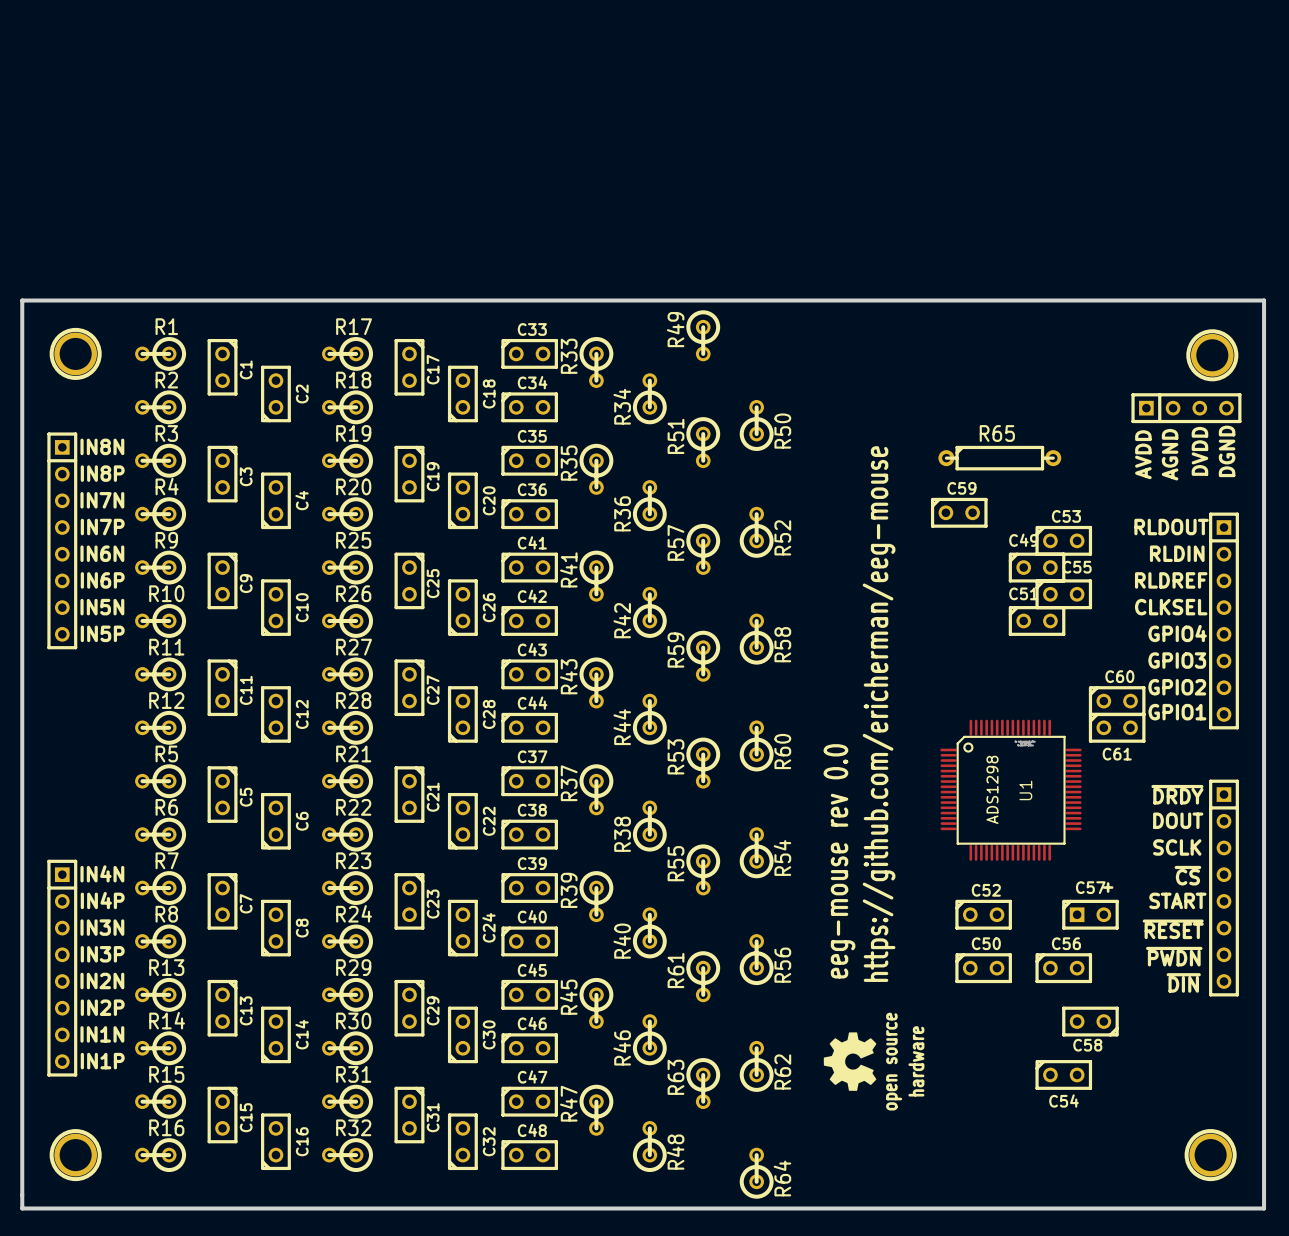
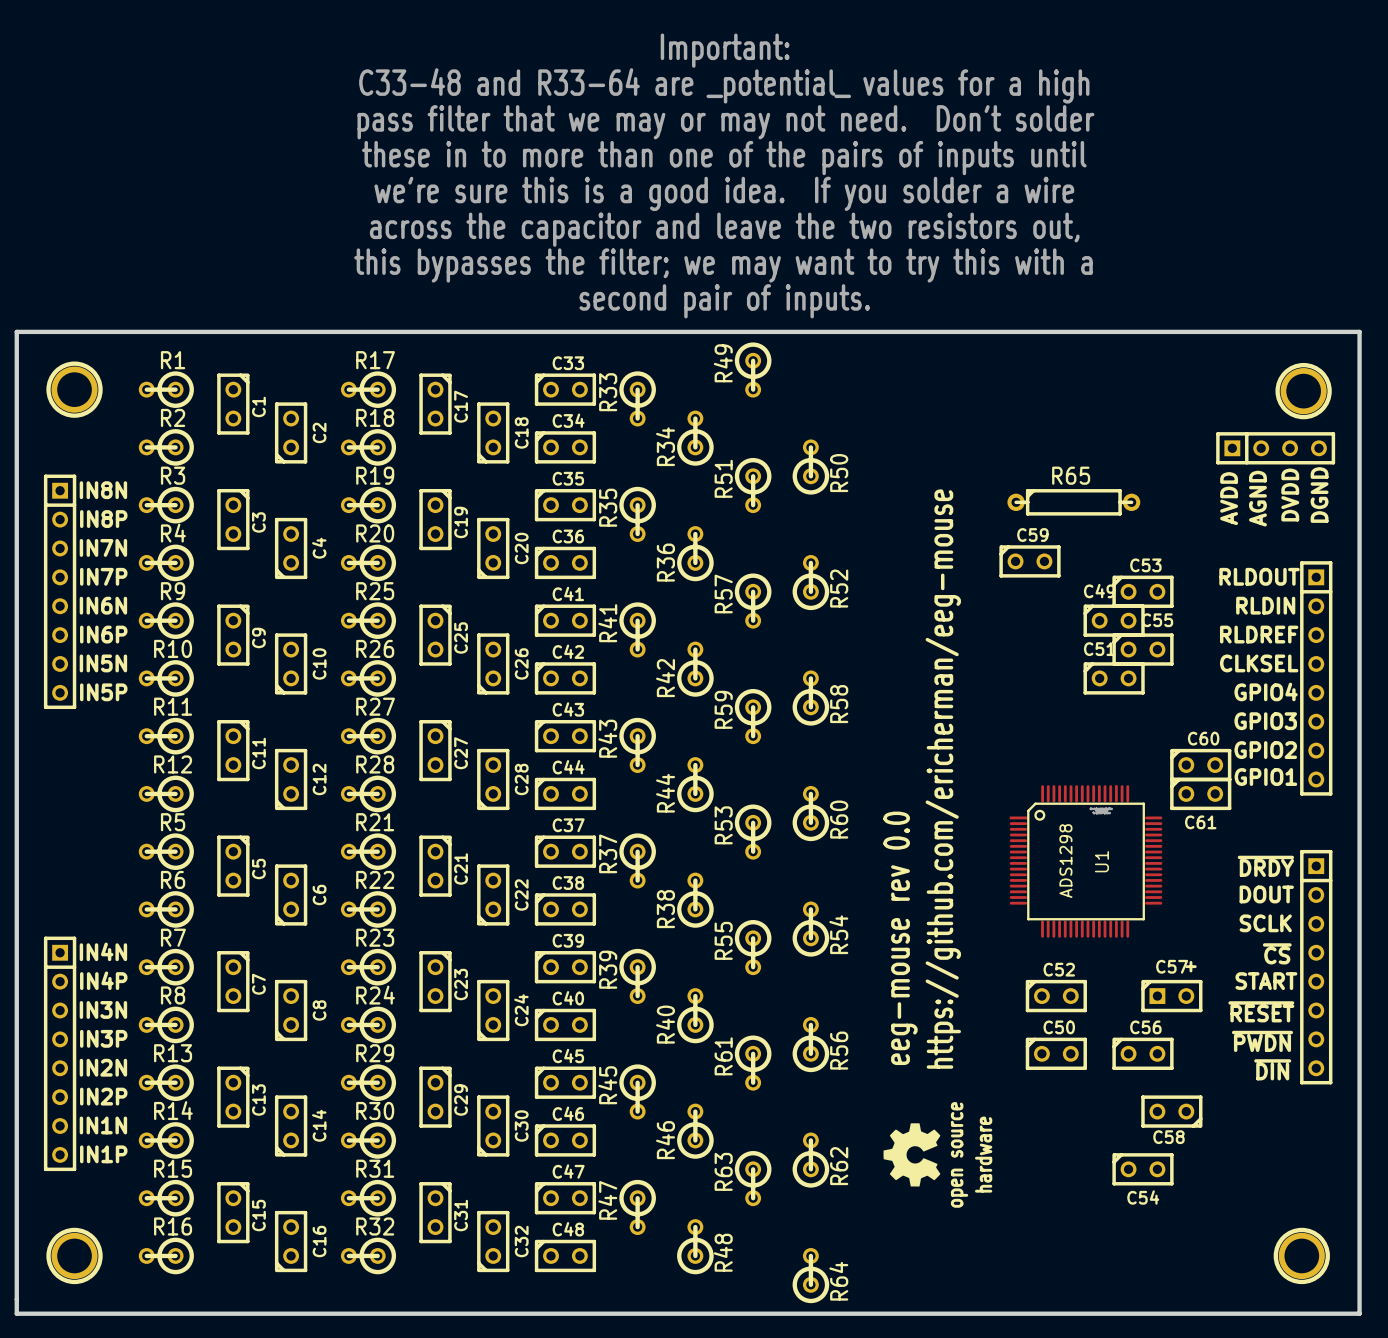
text: none -> Important: (725, 50)
text: none -> C33-48 and R33-64 are _potential_ values for a high (724, 85)
text: none -> pass filter that we may or may not need. Don't solder (725, 122)
text: none -> these in to more than one of the pairs of inputs until (724, 158)
text: none -> we're sure this is a good idea. If you solder a wire (724, 193)
text: none -> across the capacitor and leave the two resistors out, (724, 229)
text: none -> this bypasses the filter; we may want to try this with a (723, 265)
text: none -> second pair of inputs. (724, 301)

